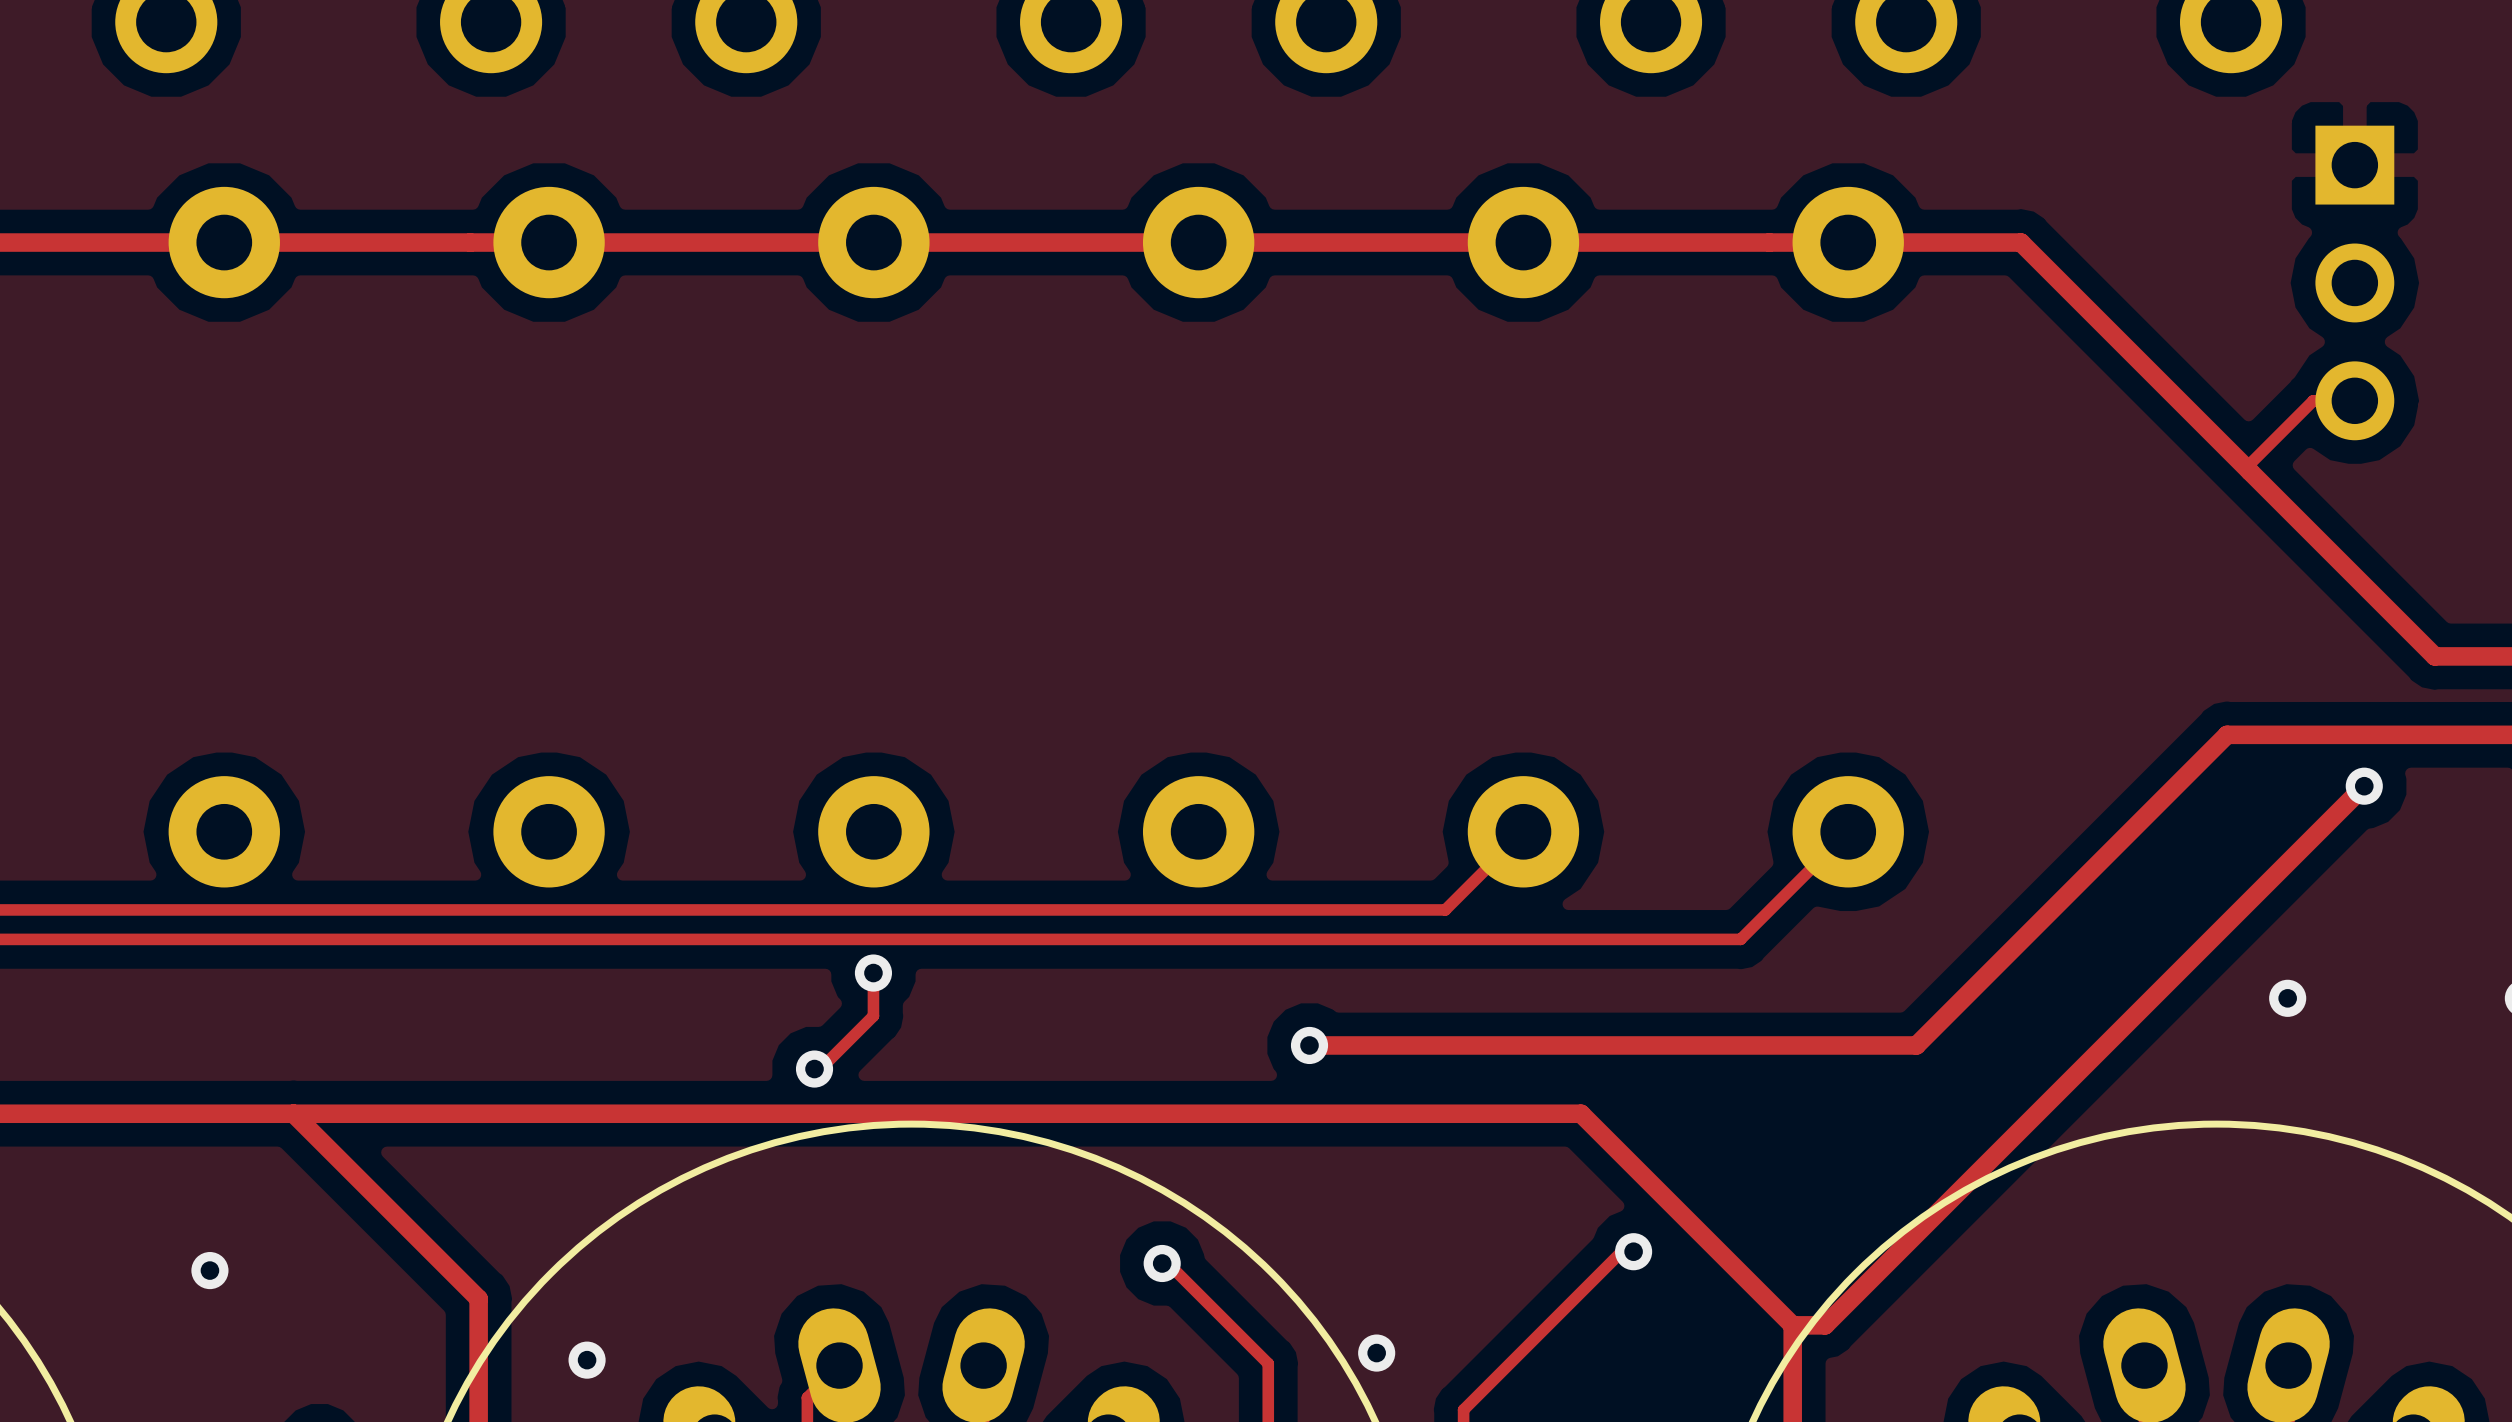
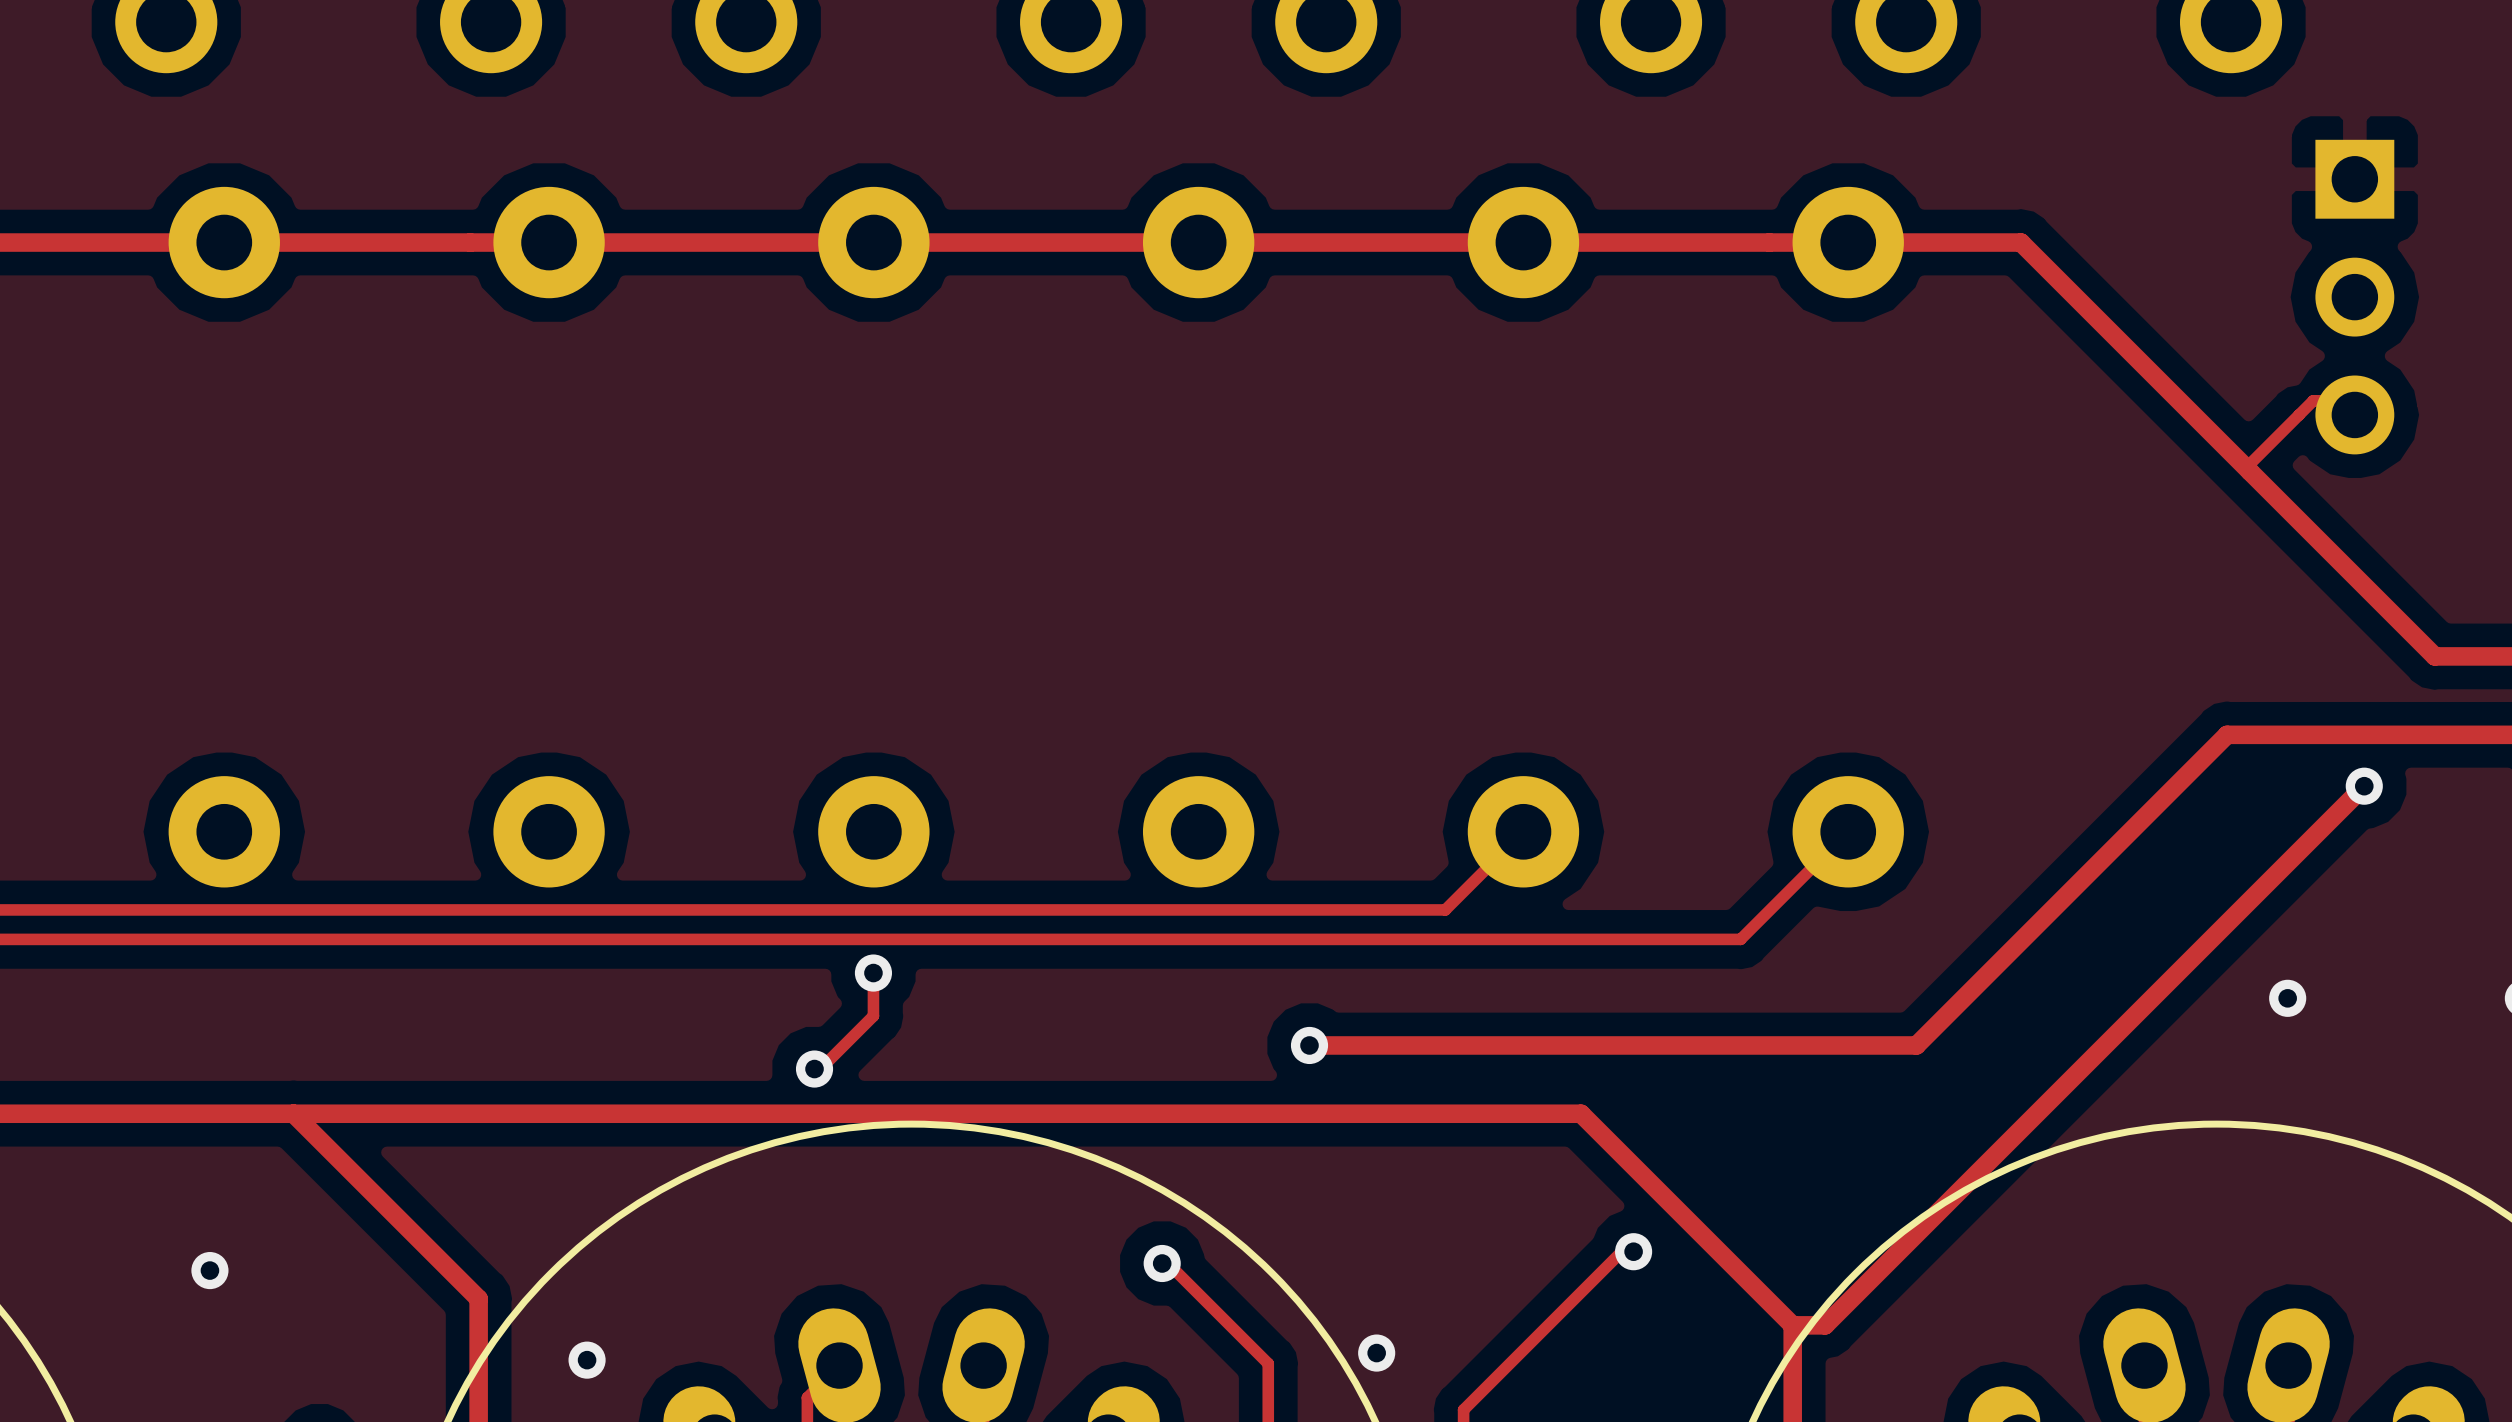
part position: (2354, 282) -> (2354, 297)

